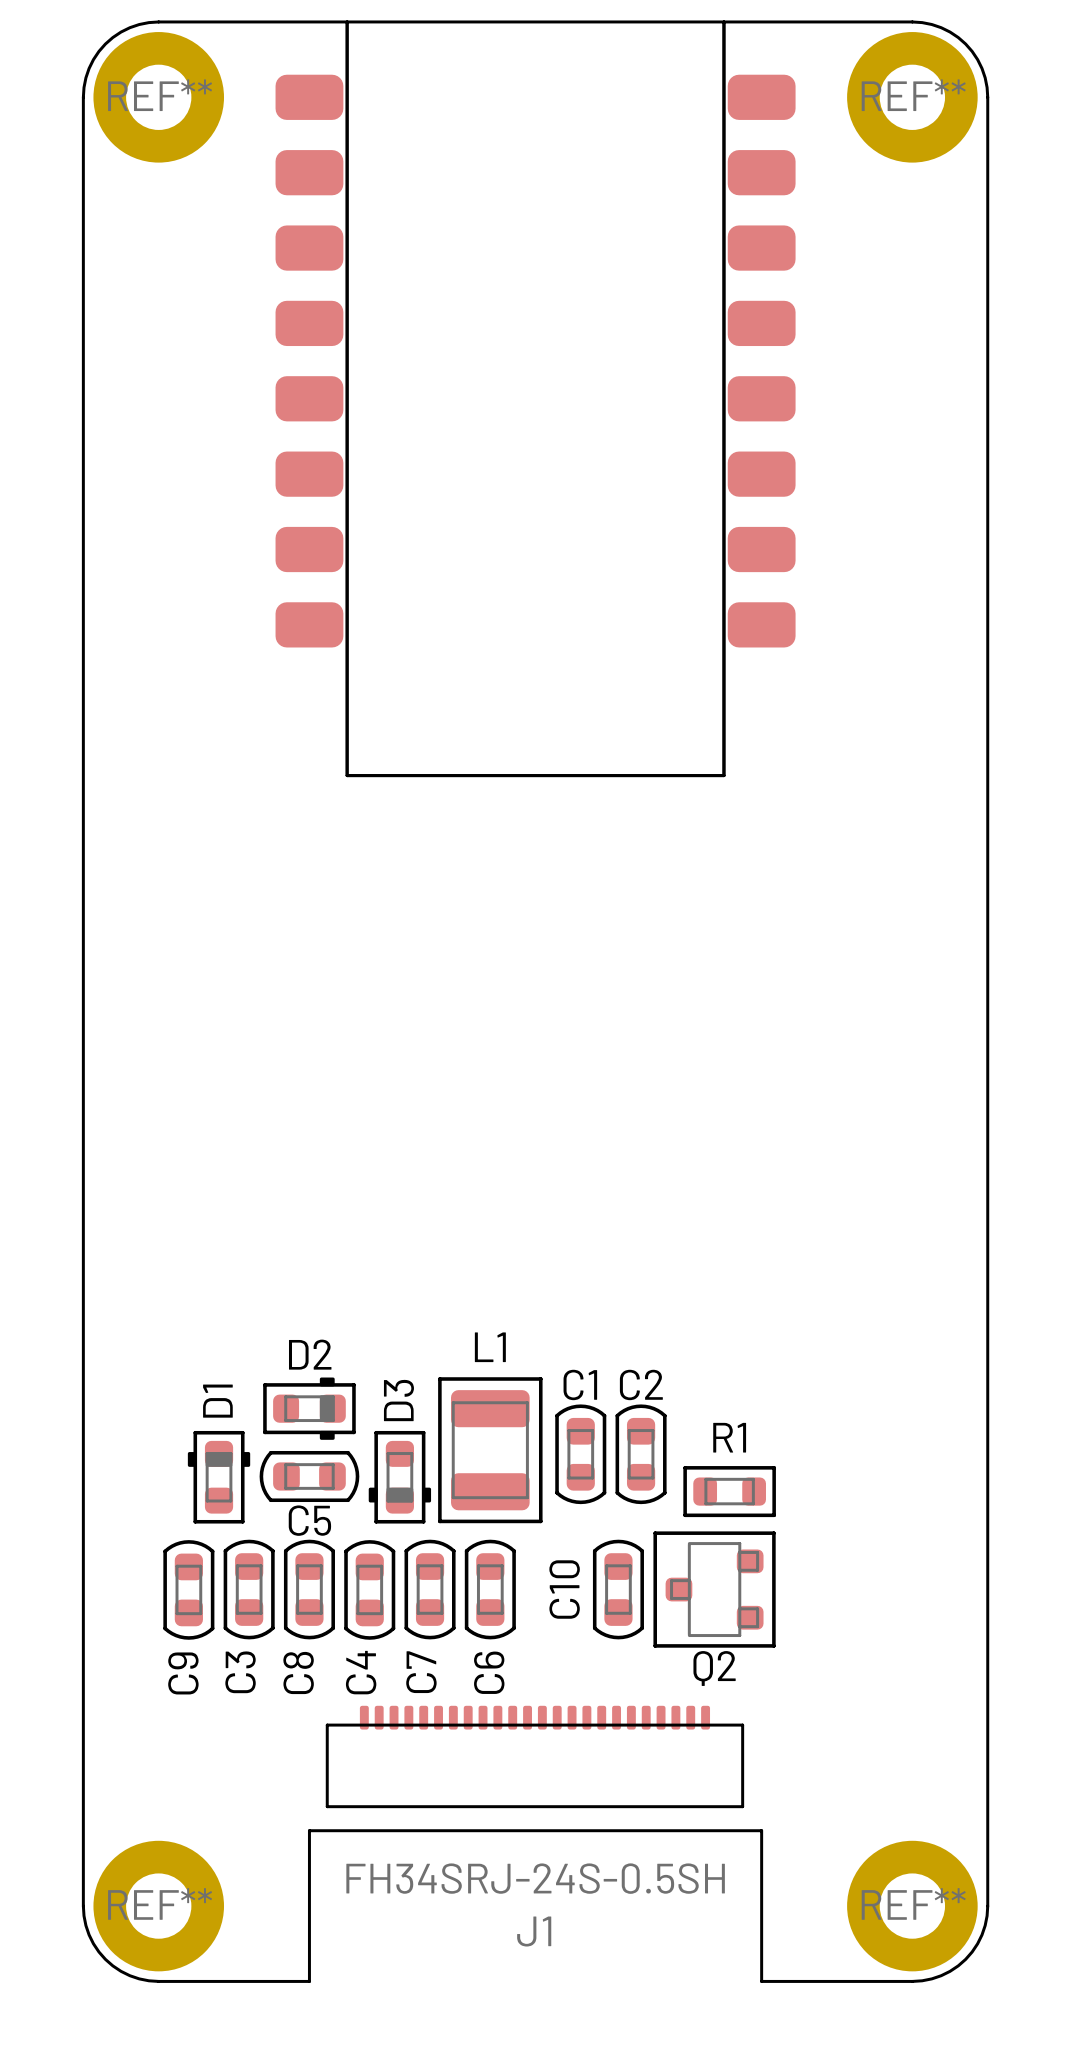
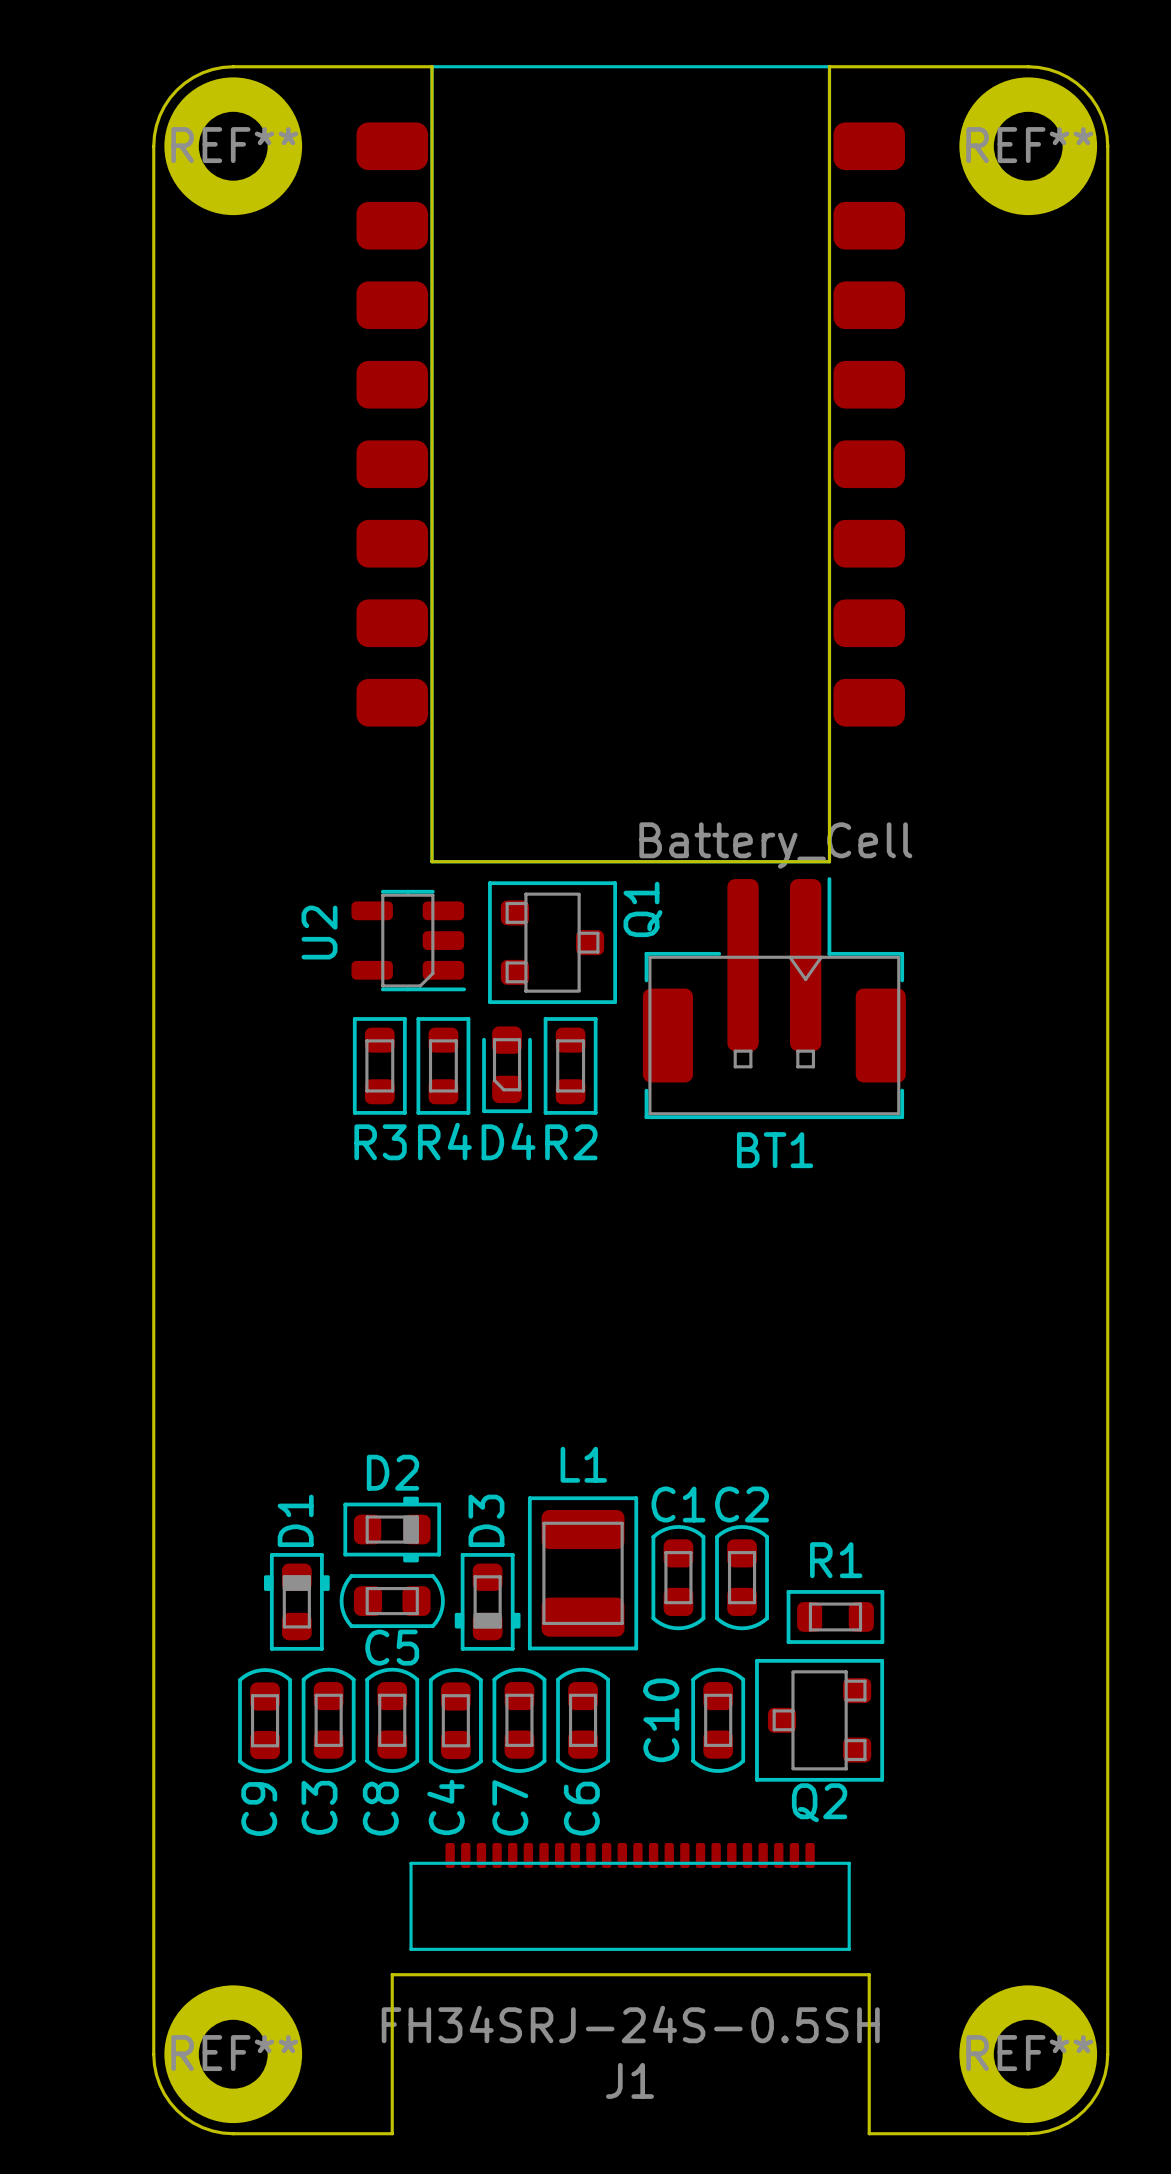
U2: none -> (408, 940)
Q1: none -> (552, 942)
BT1: none -> Battery_Cell (774, 998)
R3: none -> (379, 1065)
R4: none -> (443, 1065)
R2: none -> (570, 1065)
D4: none -> (507, 1069)

